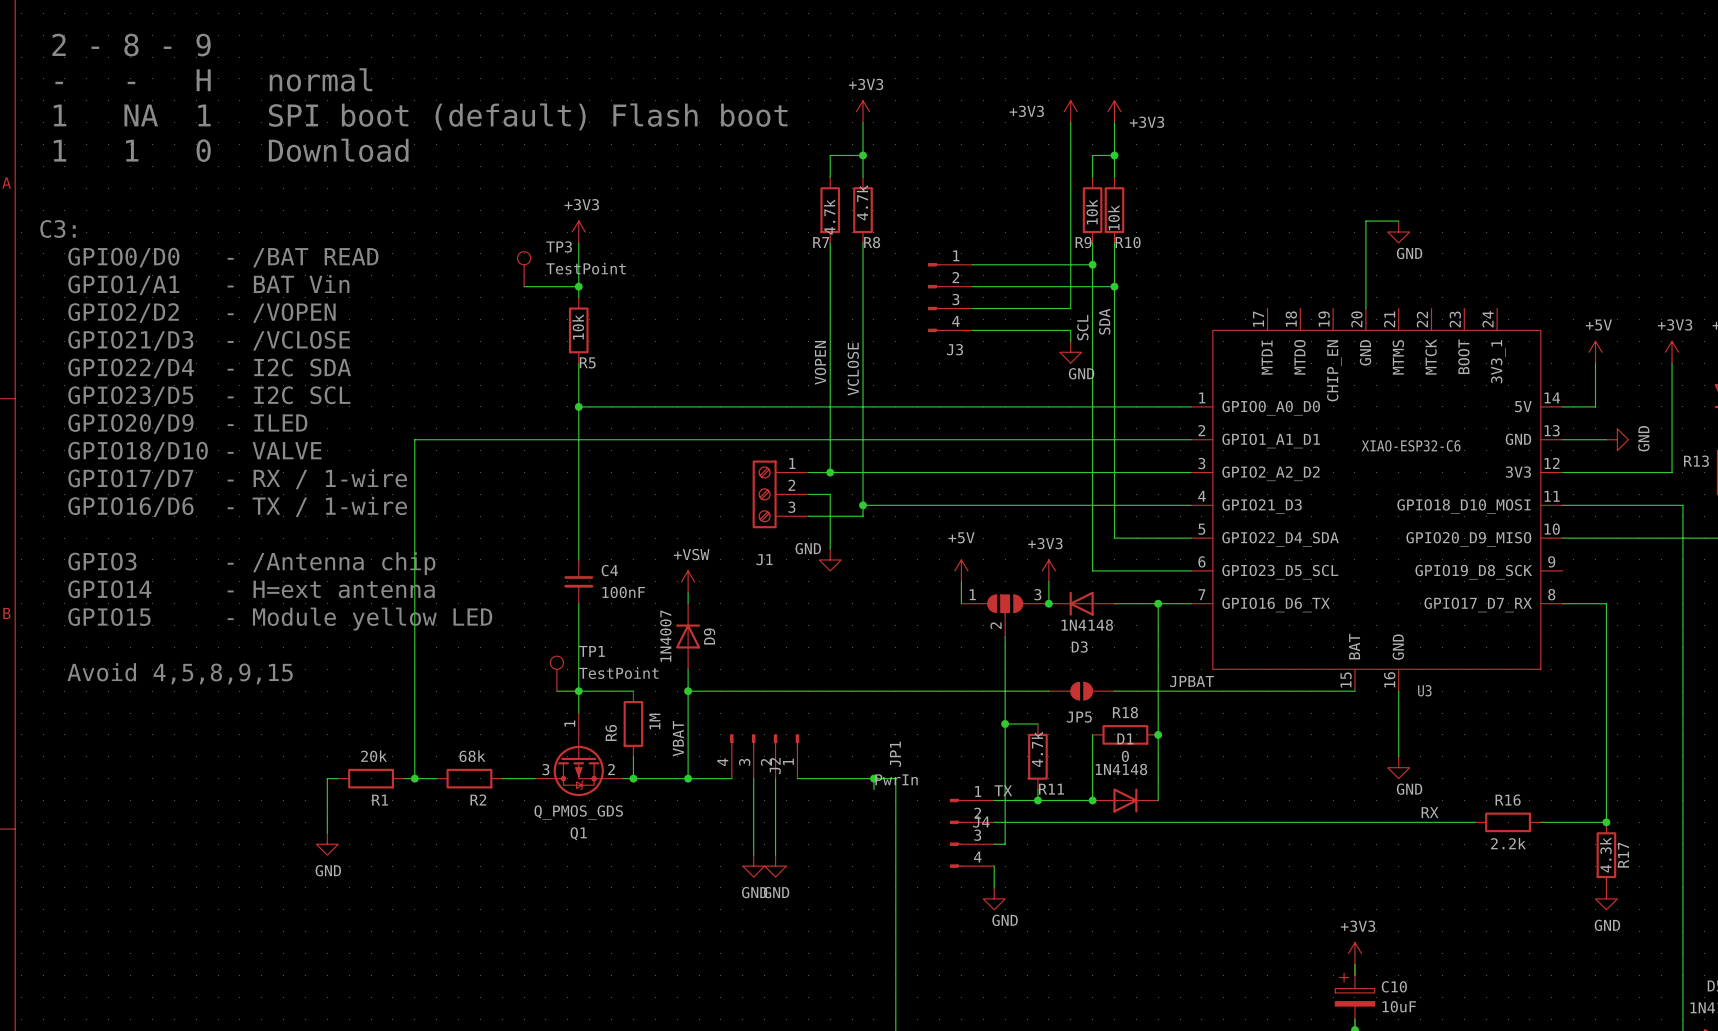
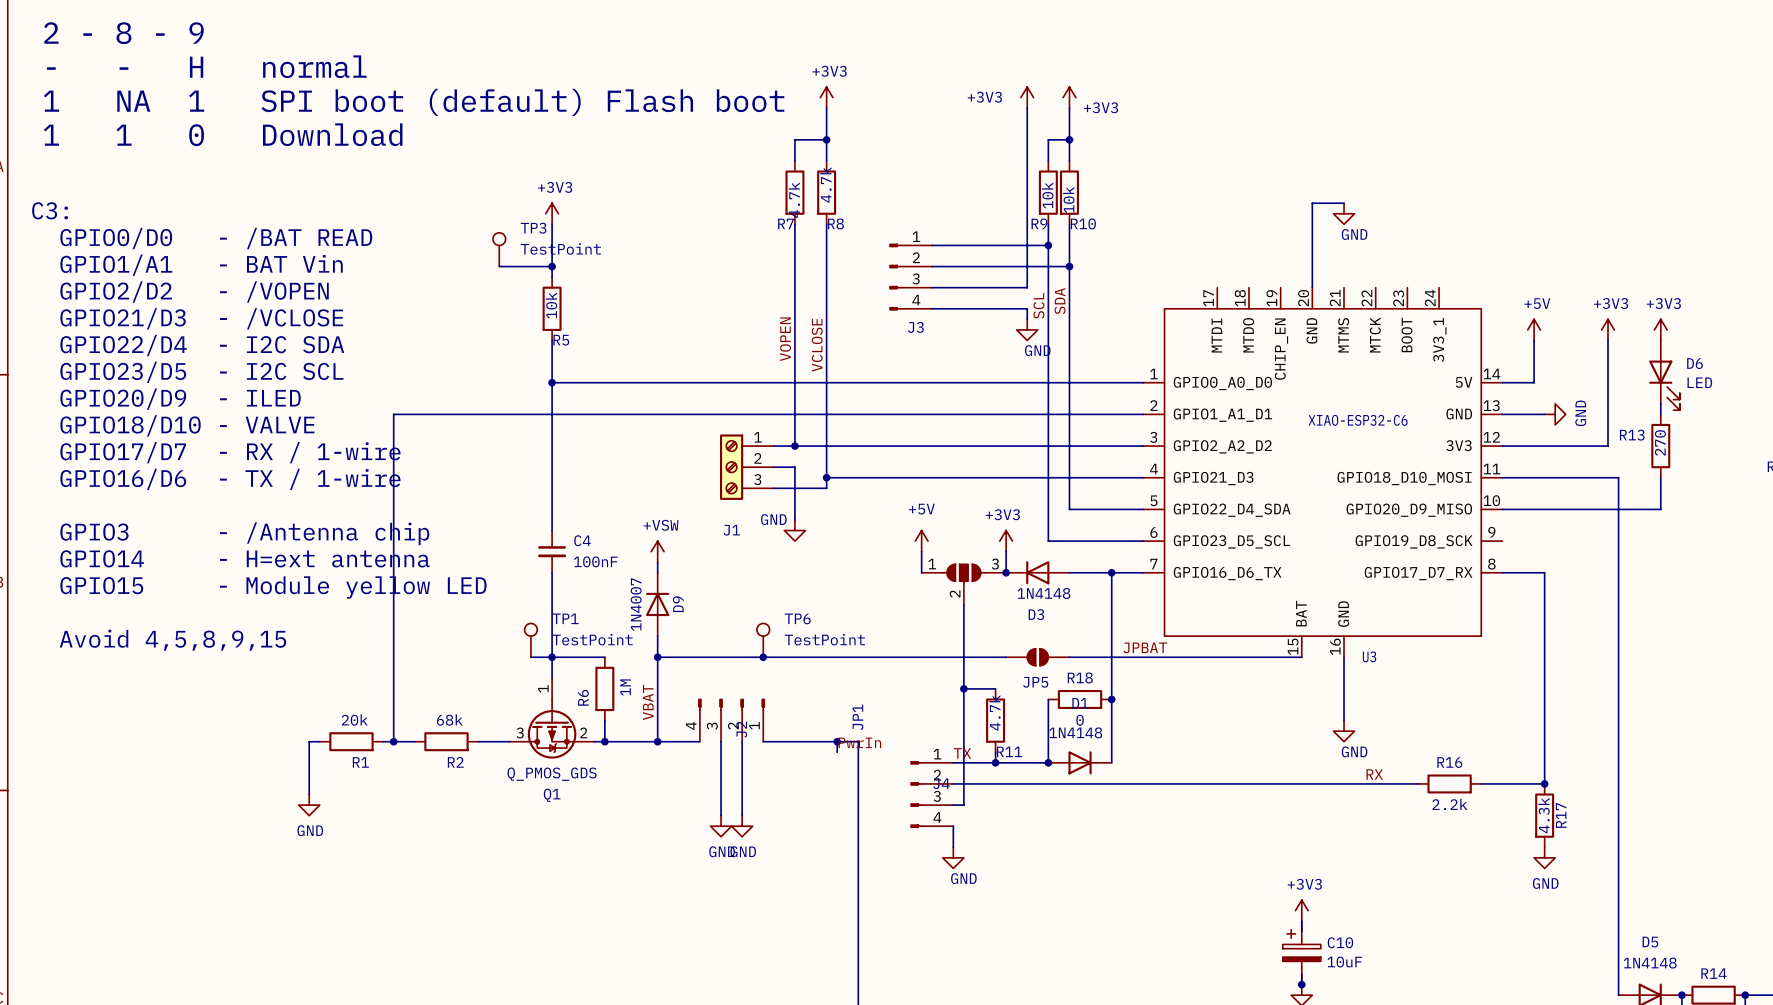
TP6: none -> TestPoint (763, 640)
junction: none -> (763, 657)

